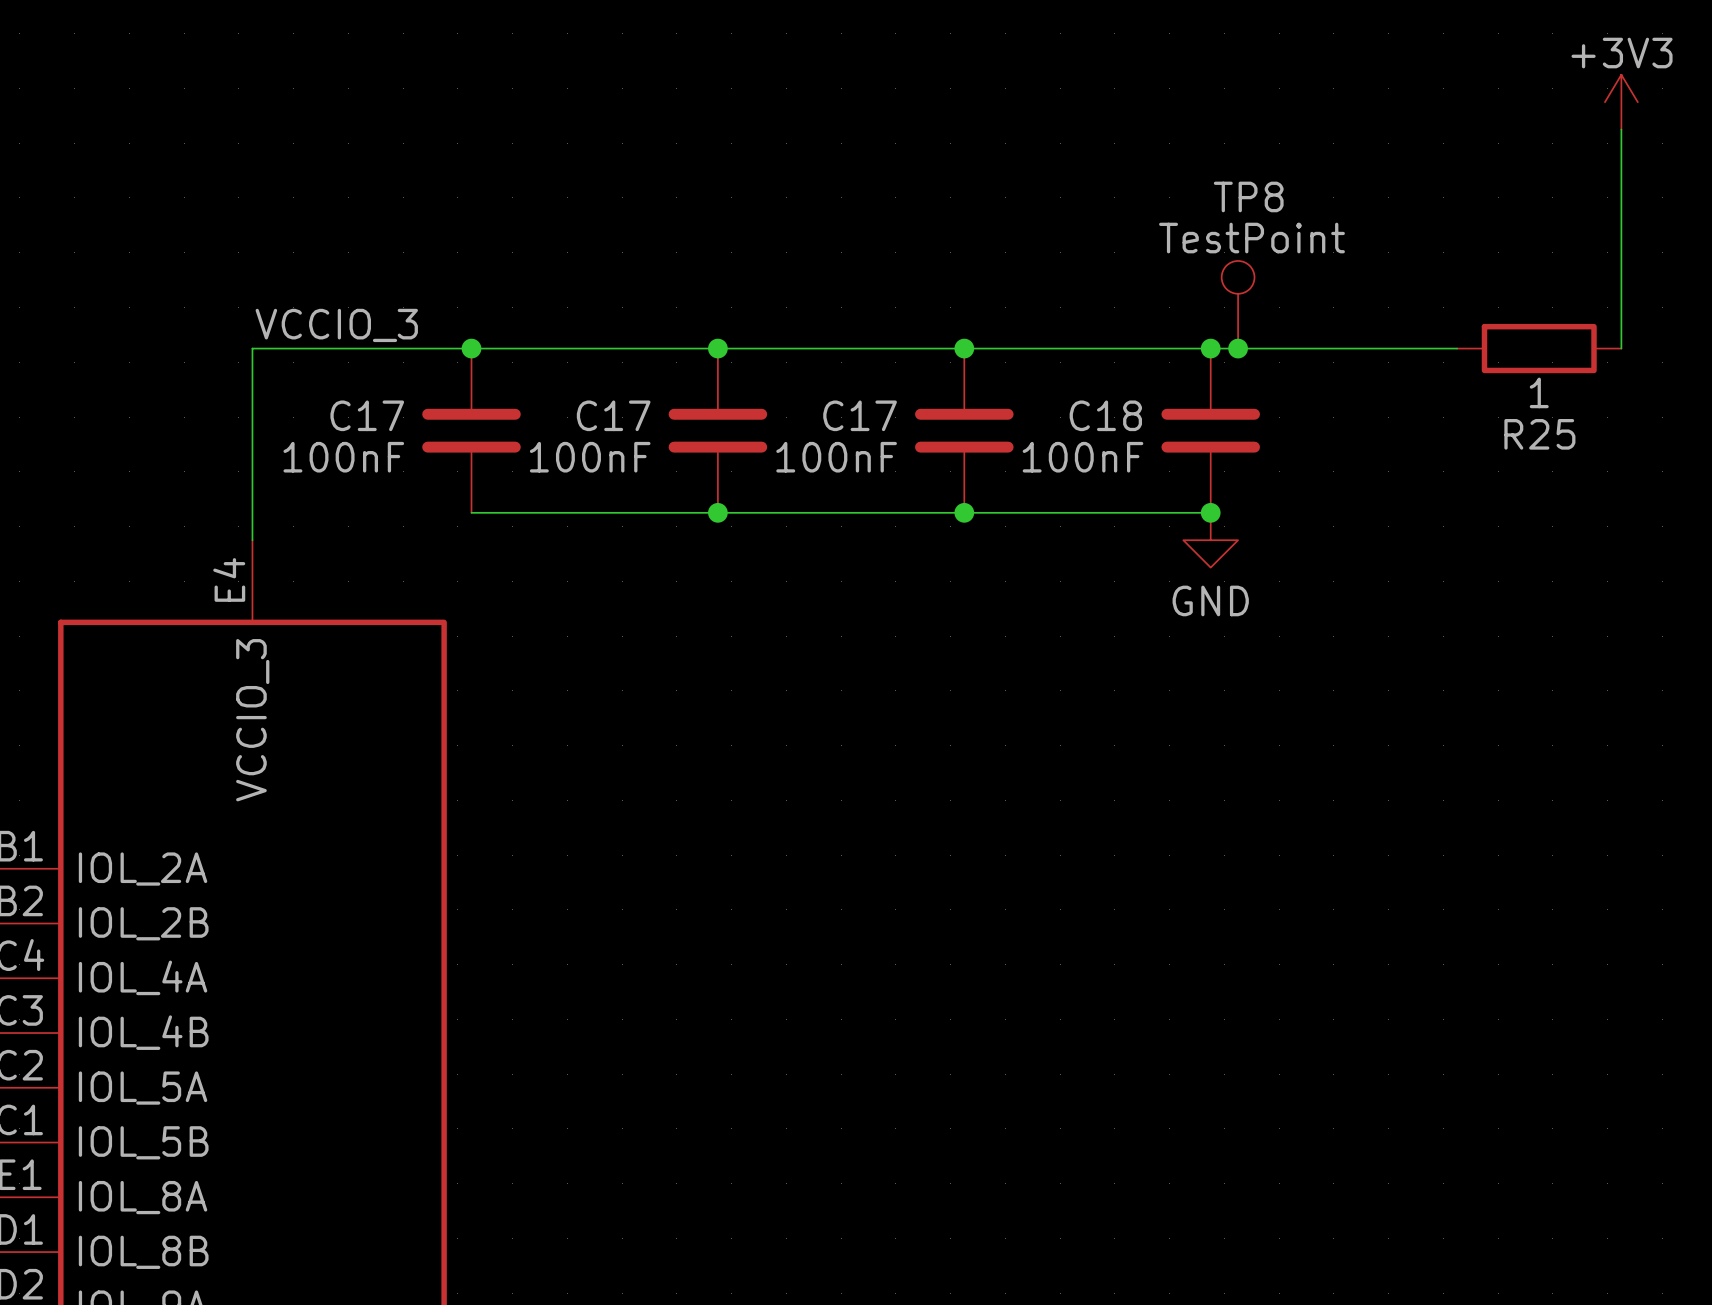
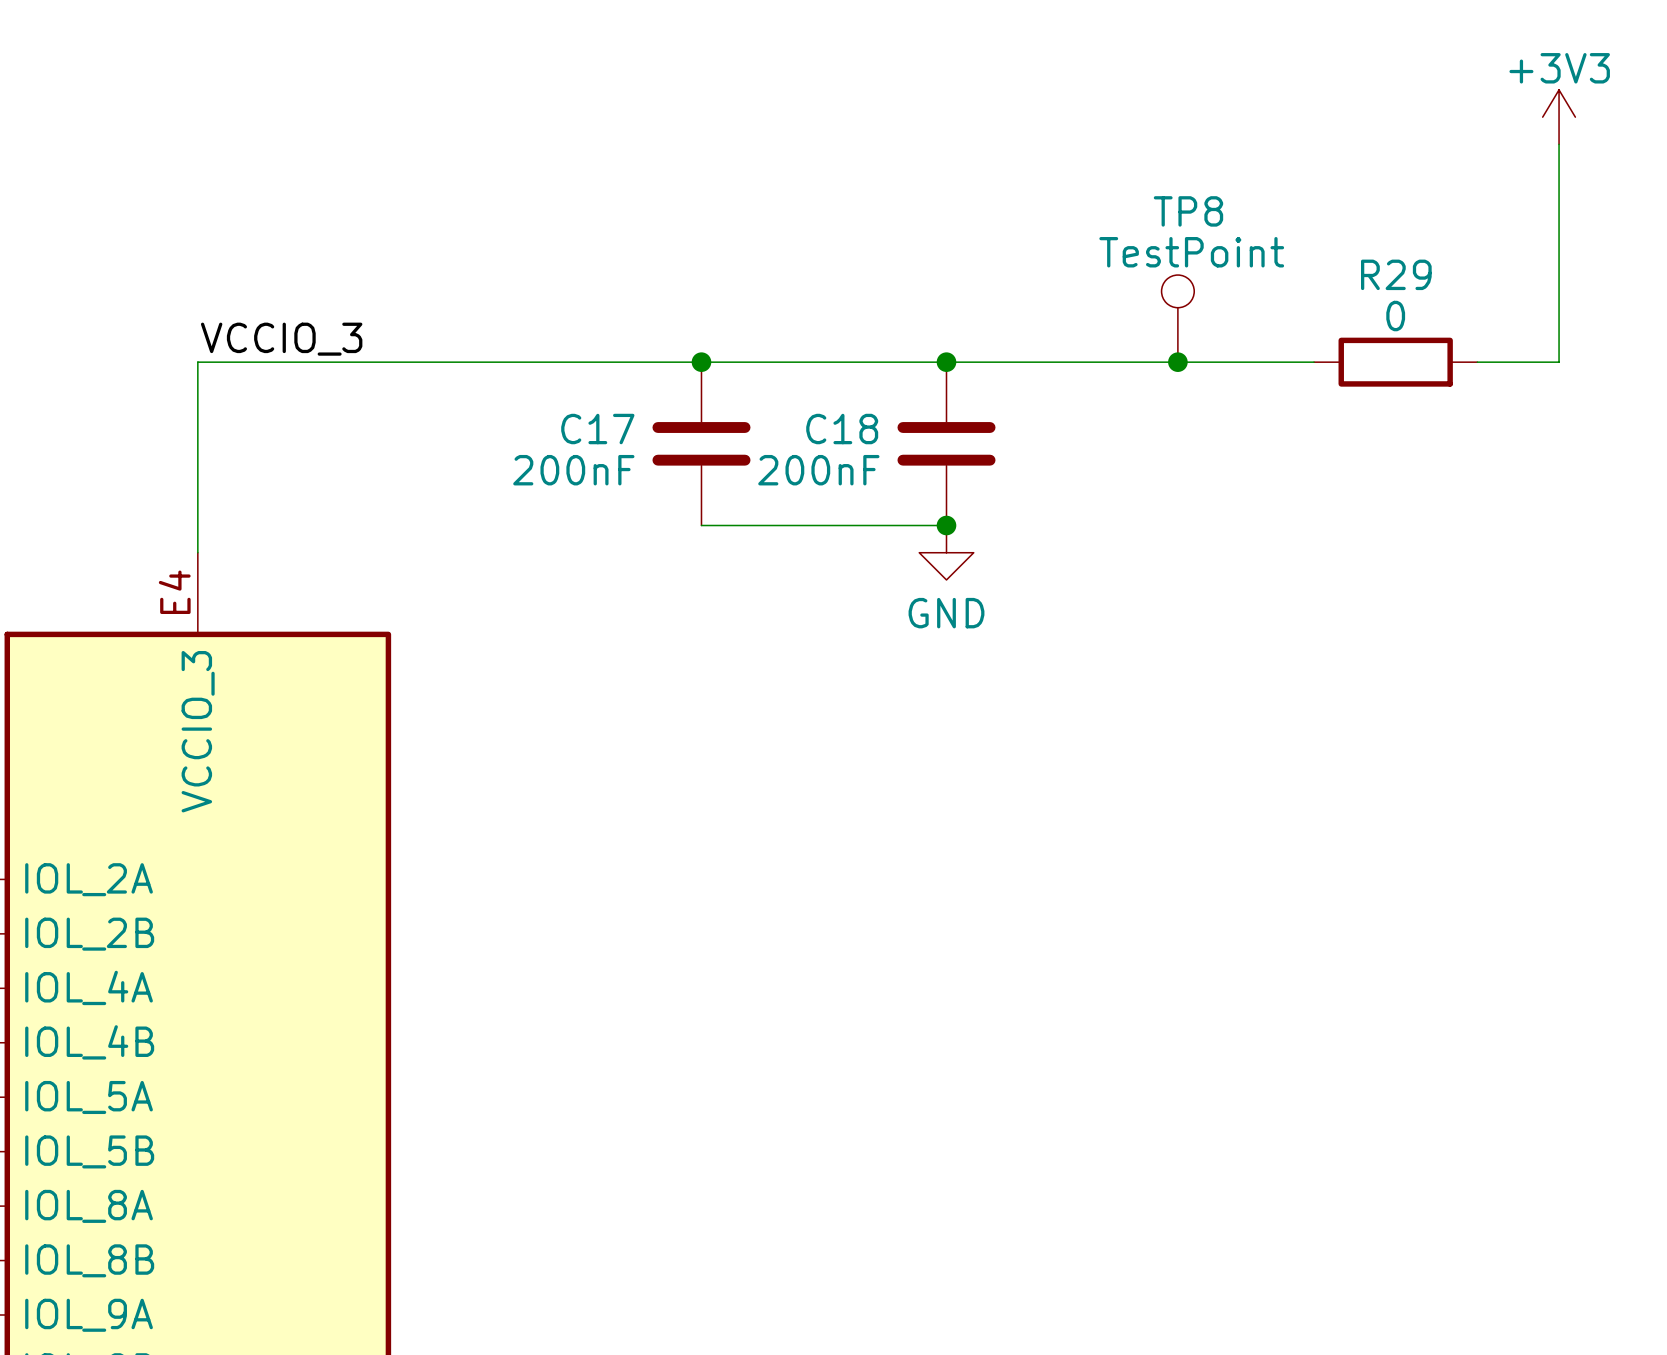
junction: (471, 348) -> none
junction position: (717, 348) -> (701, 362)
junction position: (964, 348) -> (946, 362)
junction: (1210, 348) -> none
wire: (1374, 348) (1457, 348) -> (1477, 362) (1559, 362)
R29: none -> 0 (1395, 362)
R25: 1 (1539, 348) -> none
C17: 100nF (471, 430) -> none
C17: 100nF (717, 430) -> none
C17: none -> 200nF (701, 443)
C17: 100nF (964, 430) -> none
C18 position: (1210, 430) -> (946, 443)
C18 value: 100nF (1083, 457) -> 200nF (818, 470)
wire: (471, 512) (758, 512) -> none
junction: (717, 512) -> none
junction position: (964, 512) -> (946, 525)
wire: (1005, 512) (1210, 512) -> none
junction: (1210, 512) -> none
power symbol position: GND (1210, 540) -> GND (946, 552)

